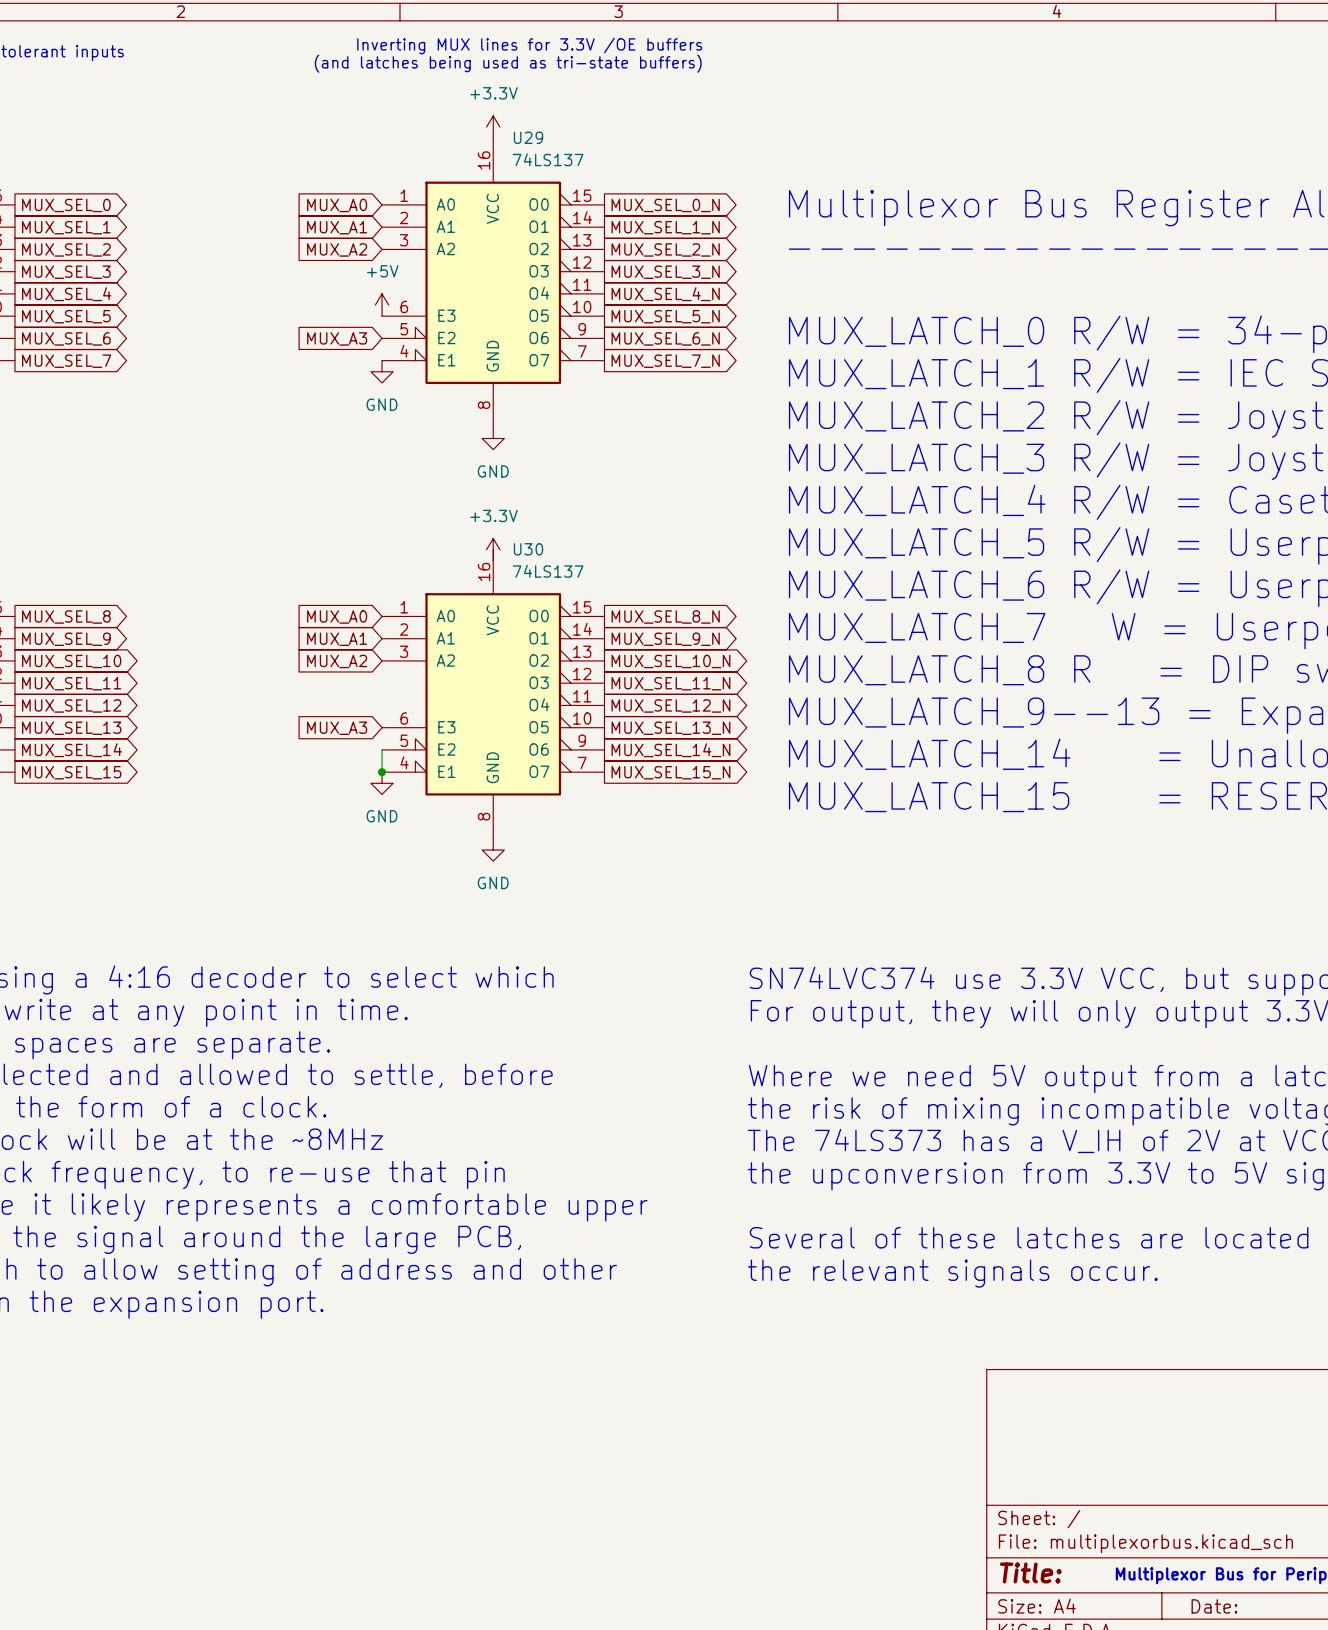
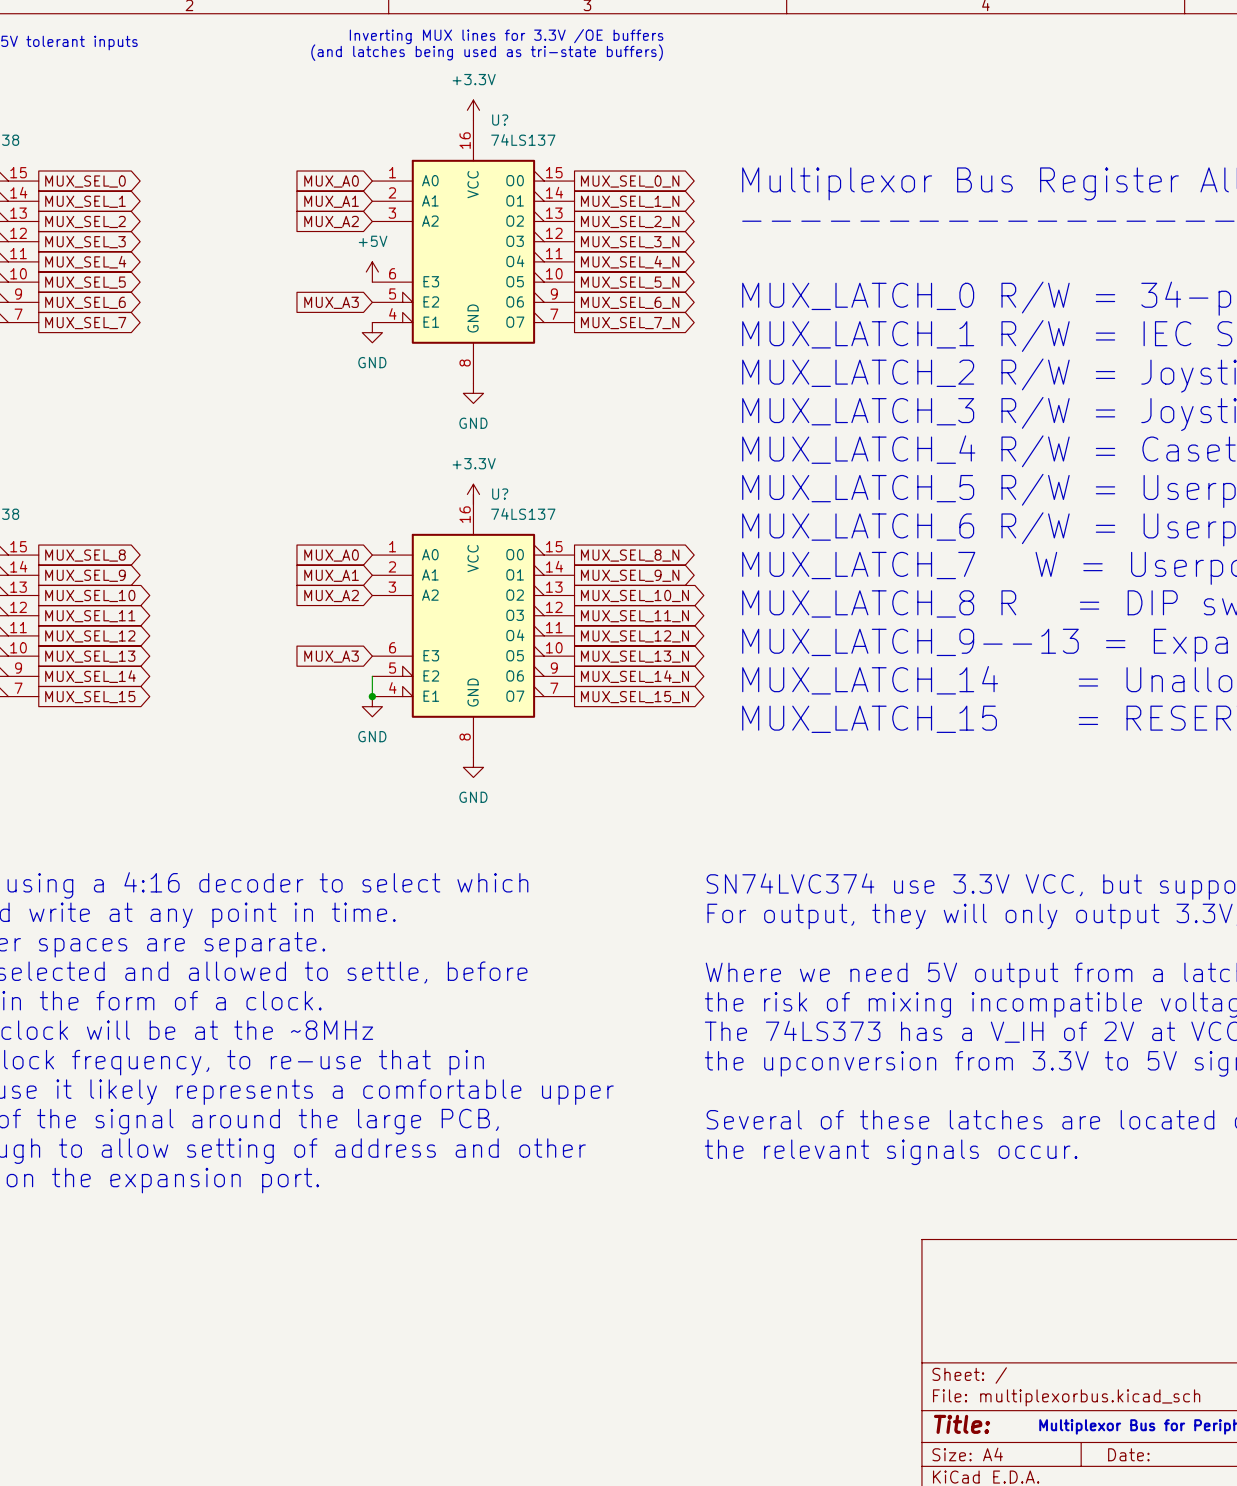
U29 name: U29 (528, 137) -> U? (500, 120)
U30 name: U30 (528, 549) -> U? (500, 494)

